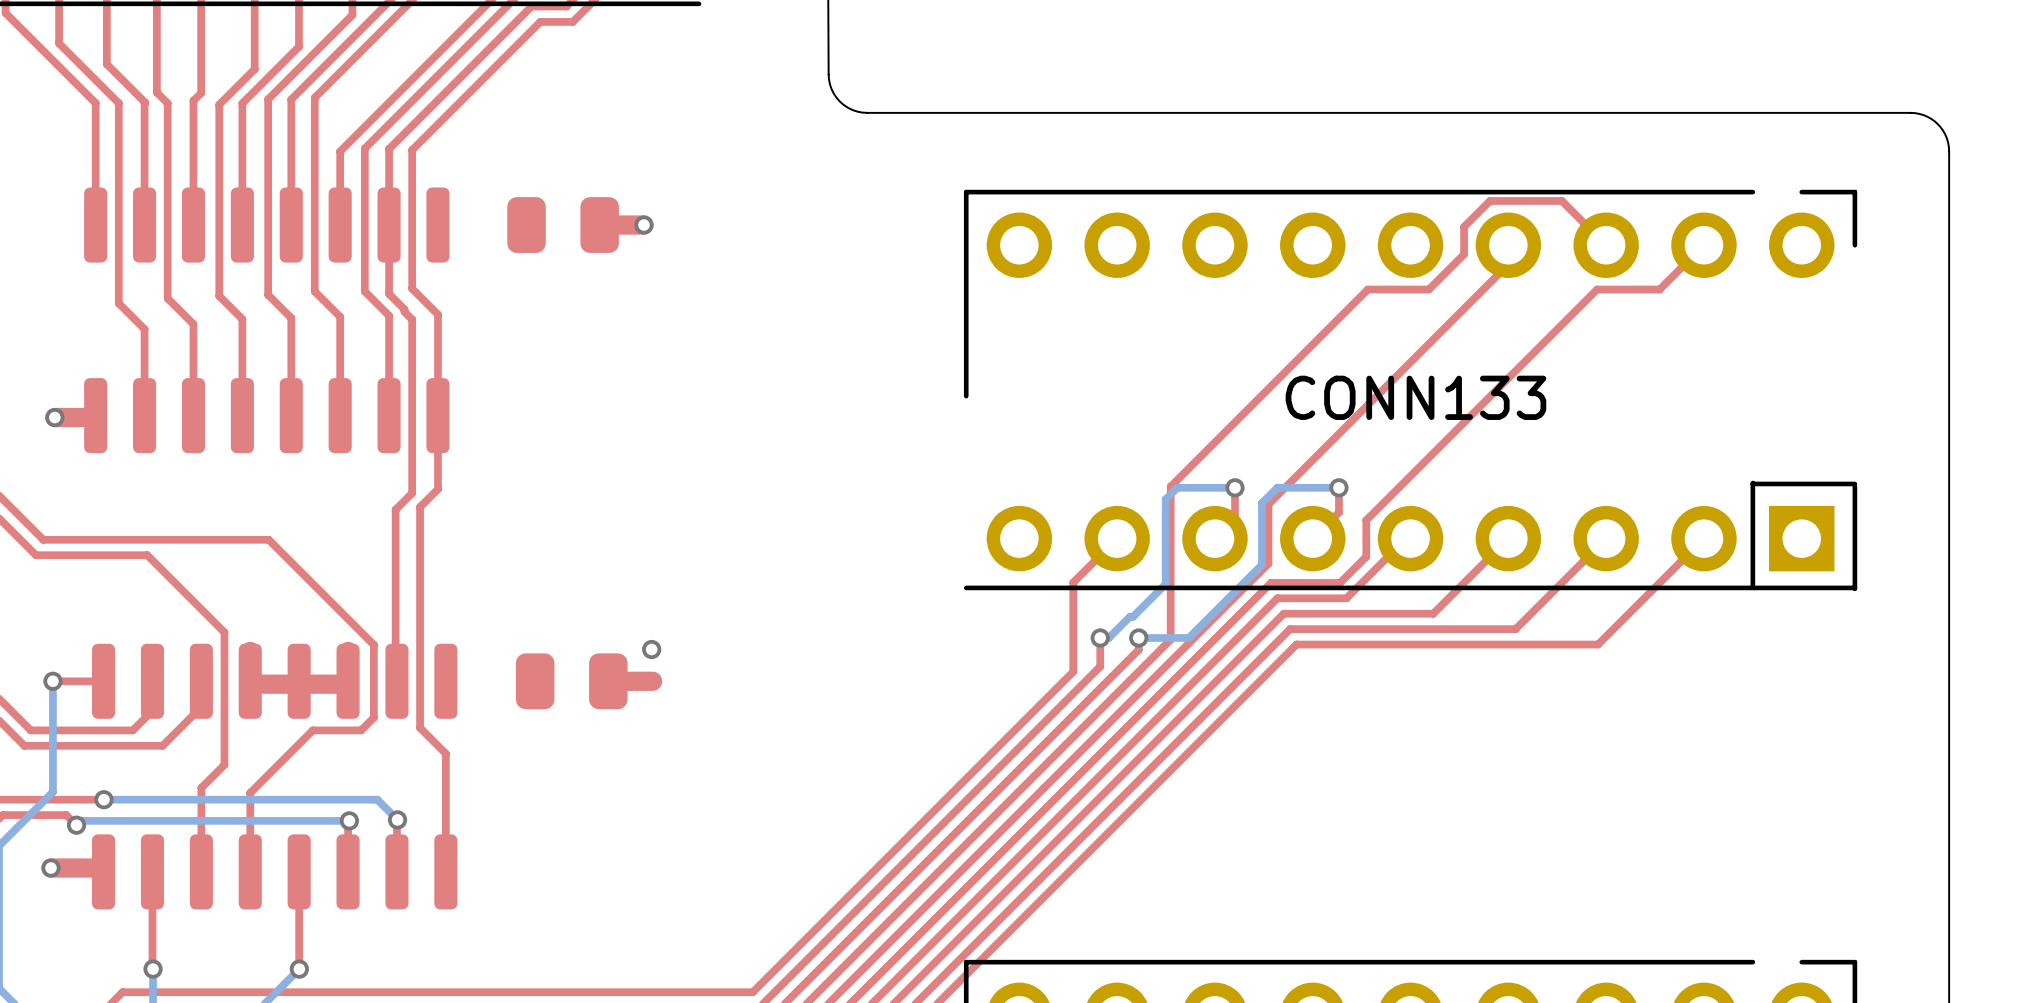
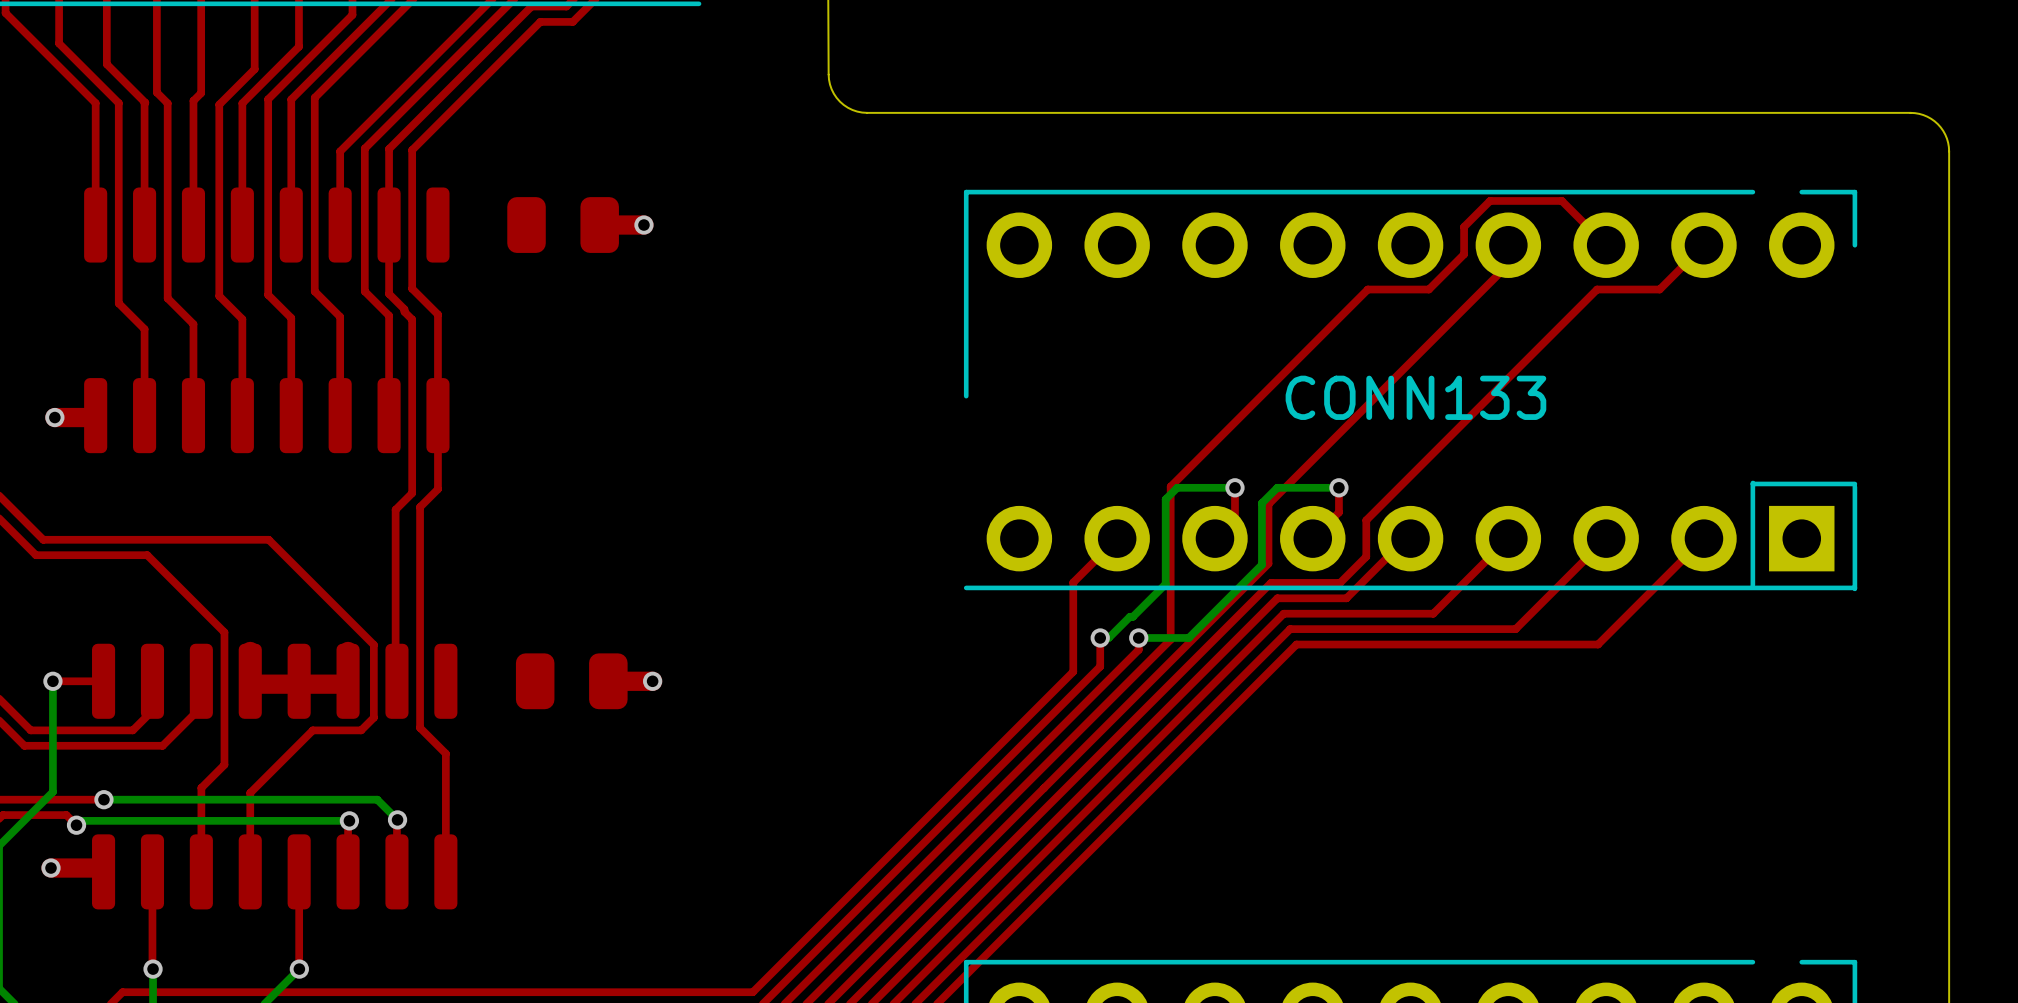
via position: (651, 649) -> (652, 681)

